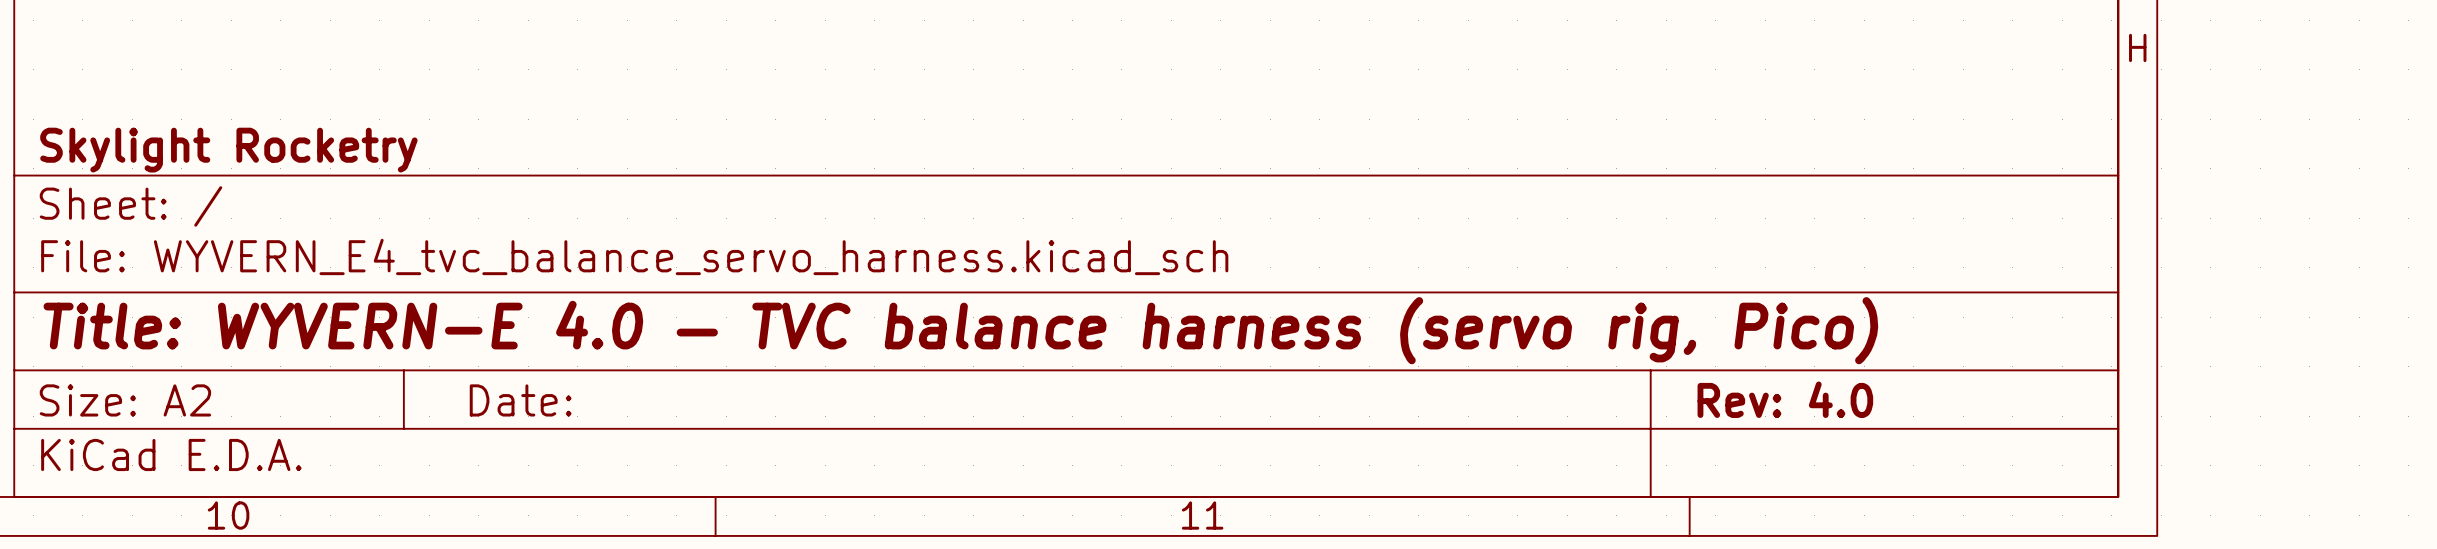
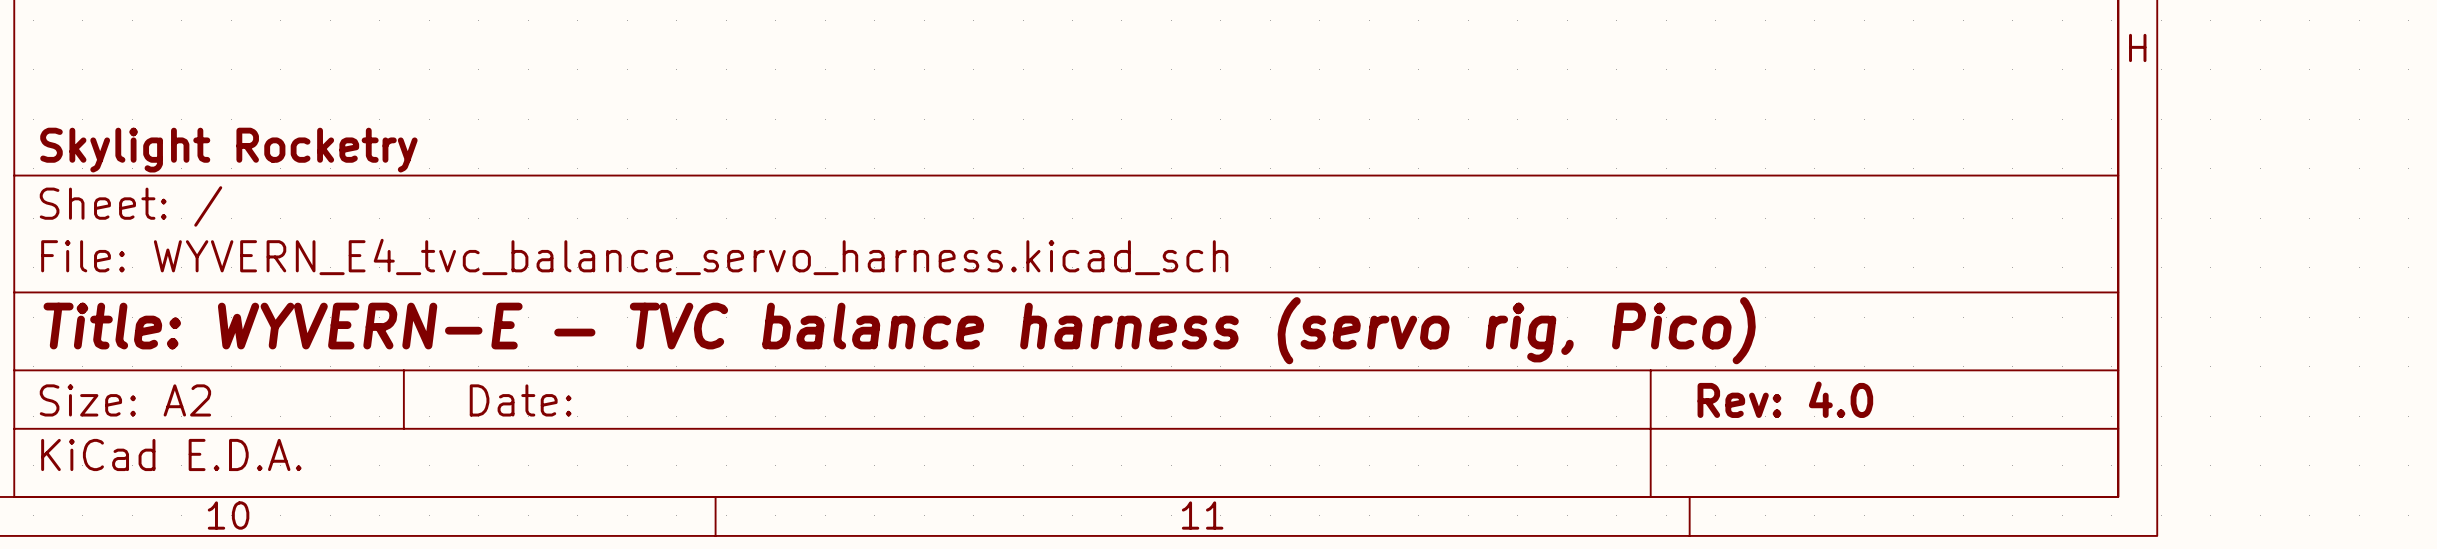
title block: Title: WYVERN-E 4.0 — TVC balance harness (servo rig, Pico) (960, 330) -> Title: WYVERN-E — TVC balance harness (servo rig, Pico) (899, 330)

